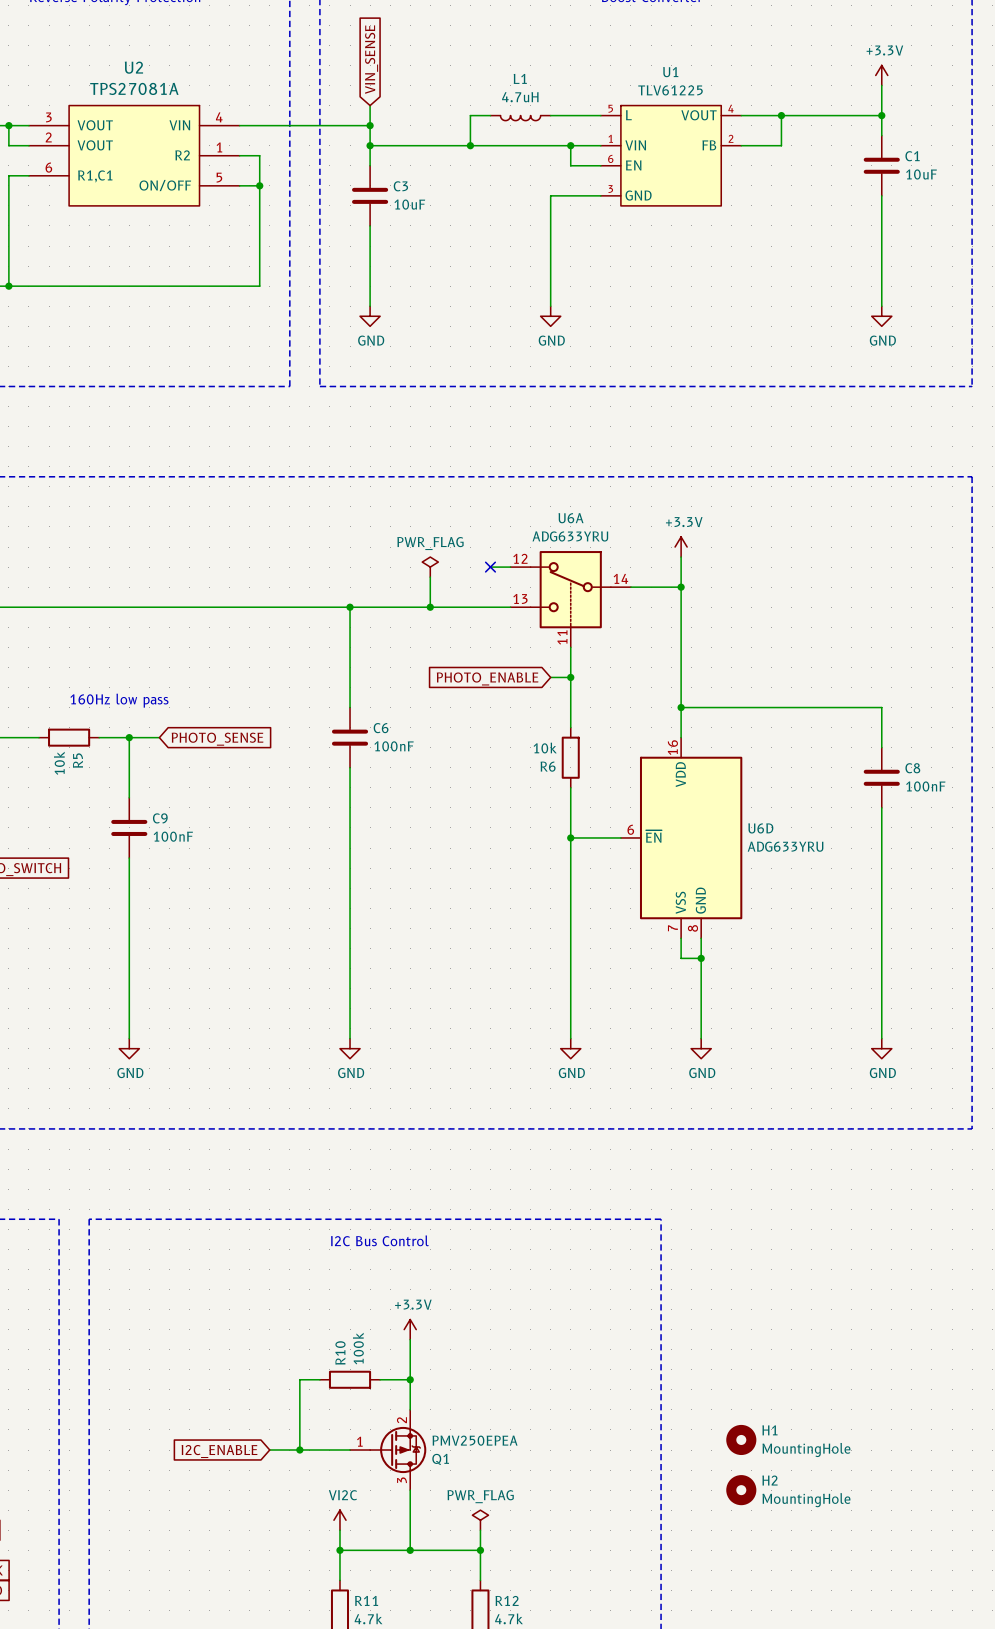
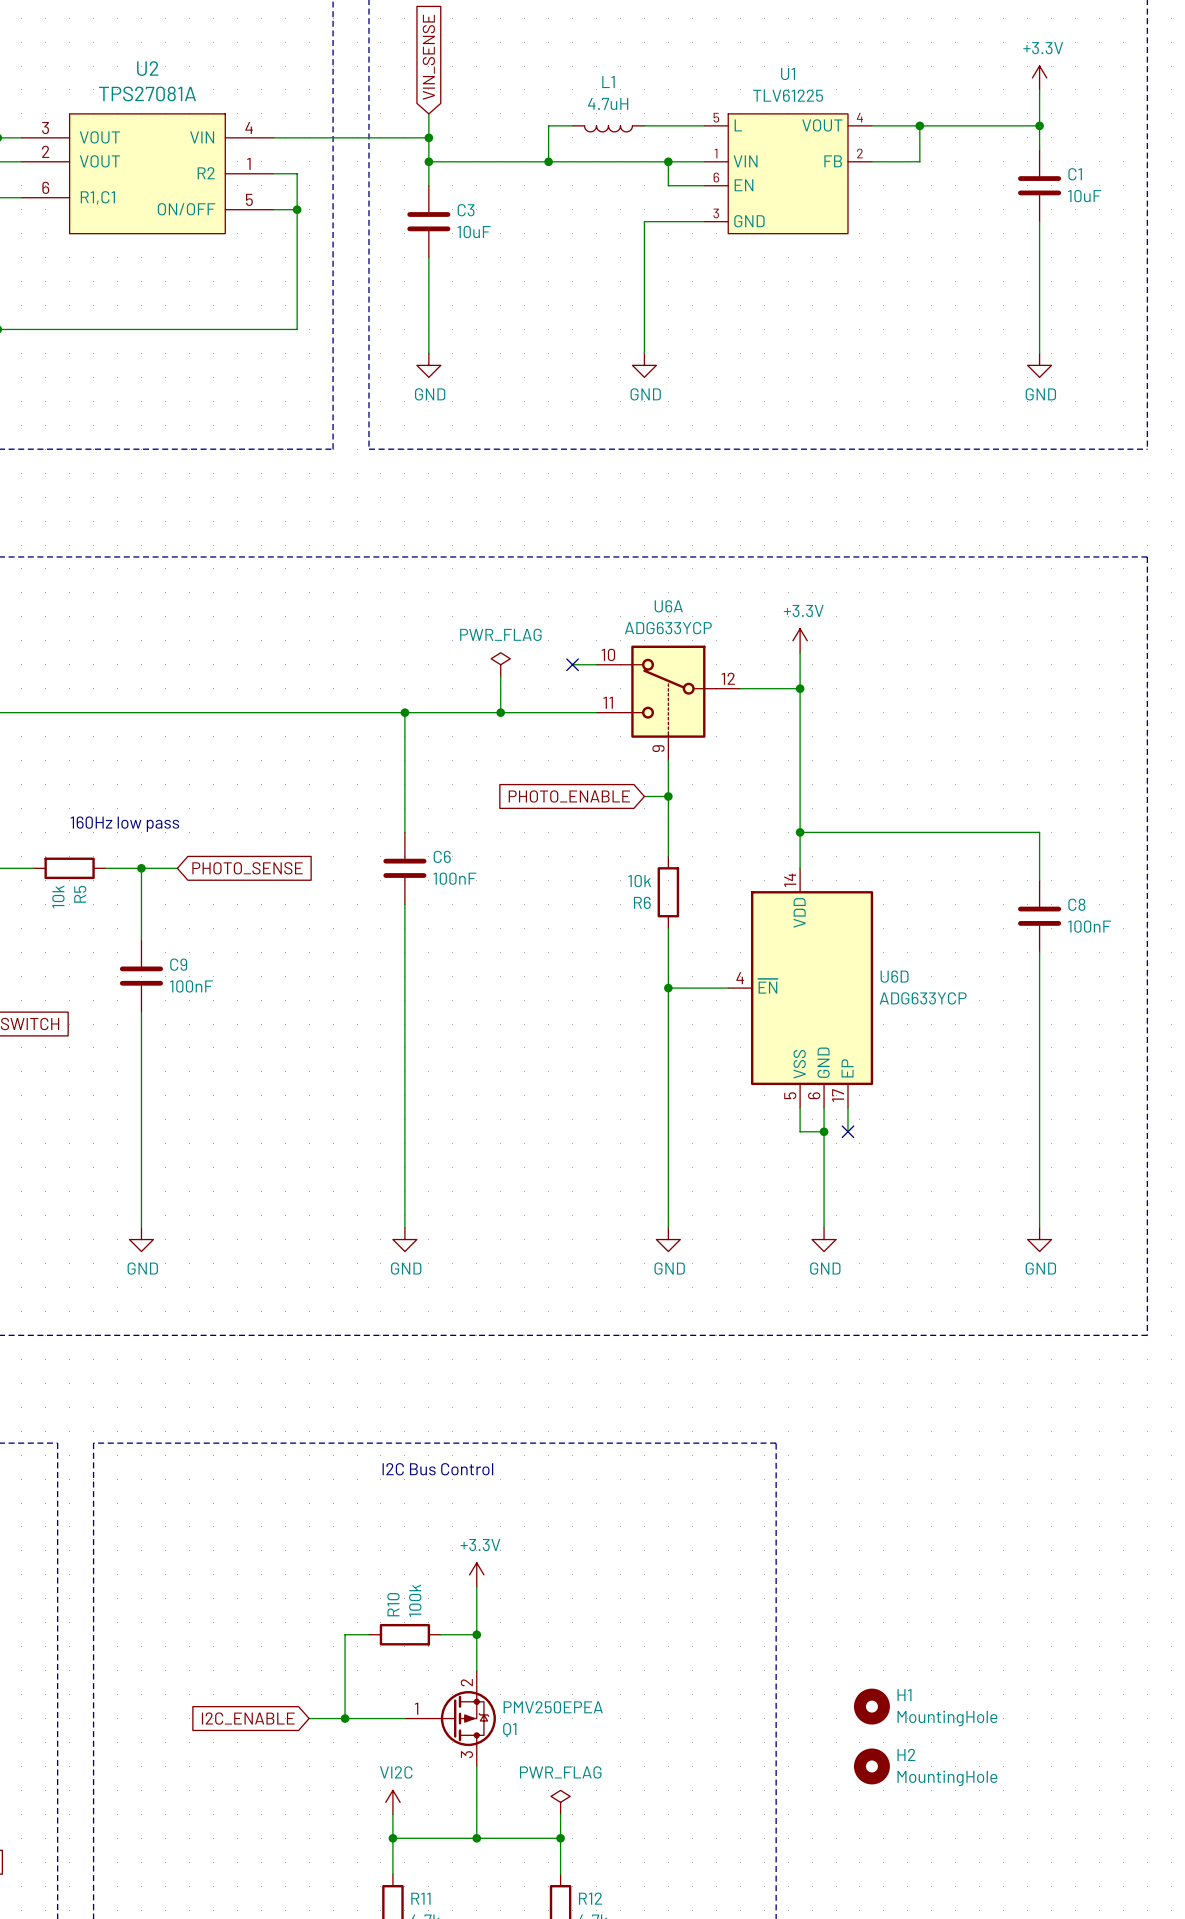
U6A value: ADG633YRU (570, 536) -> ADG633YCP (668, 628)
U6A pin number: 12 (520, 558) -> 10 (608, 654)
U6A pin number: 14 (620, 578) -> 12 (728, 678)
U6A pin number: 13 (520, 598) -> 11 (608, 702)
U6A pin number: 11 (562, 637) -> 9 (658, 748)
U6D symbol: [620, 737, 743, 939] -> [728, 868, 874, 1108]
U6D value: ADG633YRU (785, 846) -> ADG633YCP (923, 998)
wire: none -> (847, 1107) (847, 1131)
no-connect mark: none -> (847, 1131)

